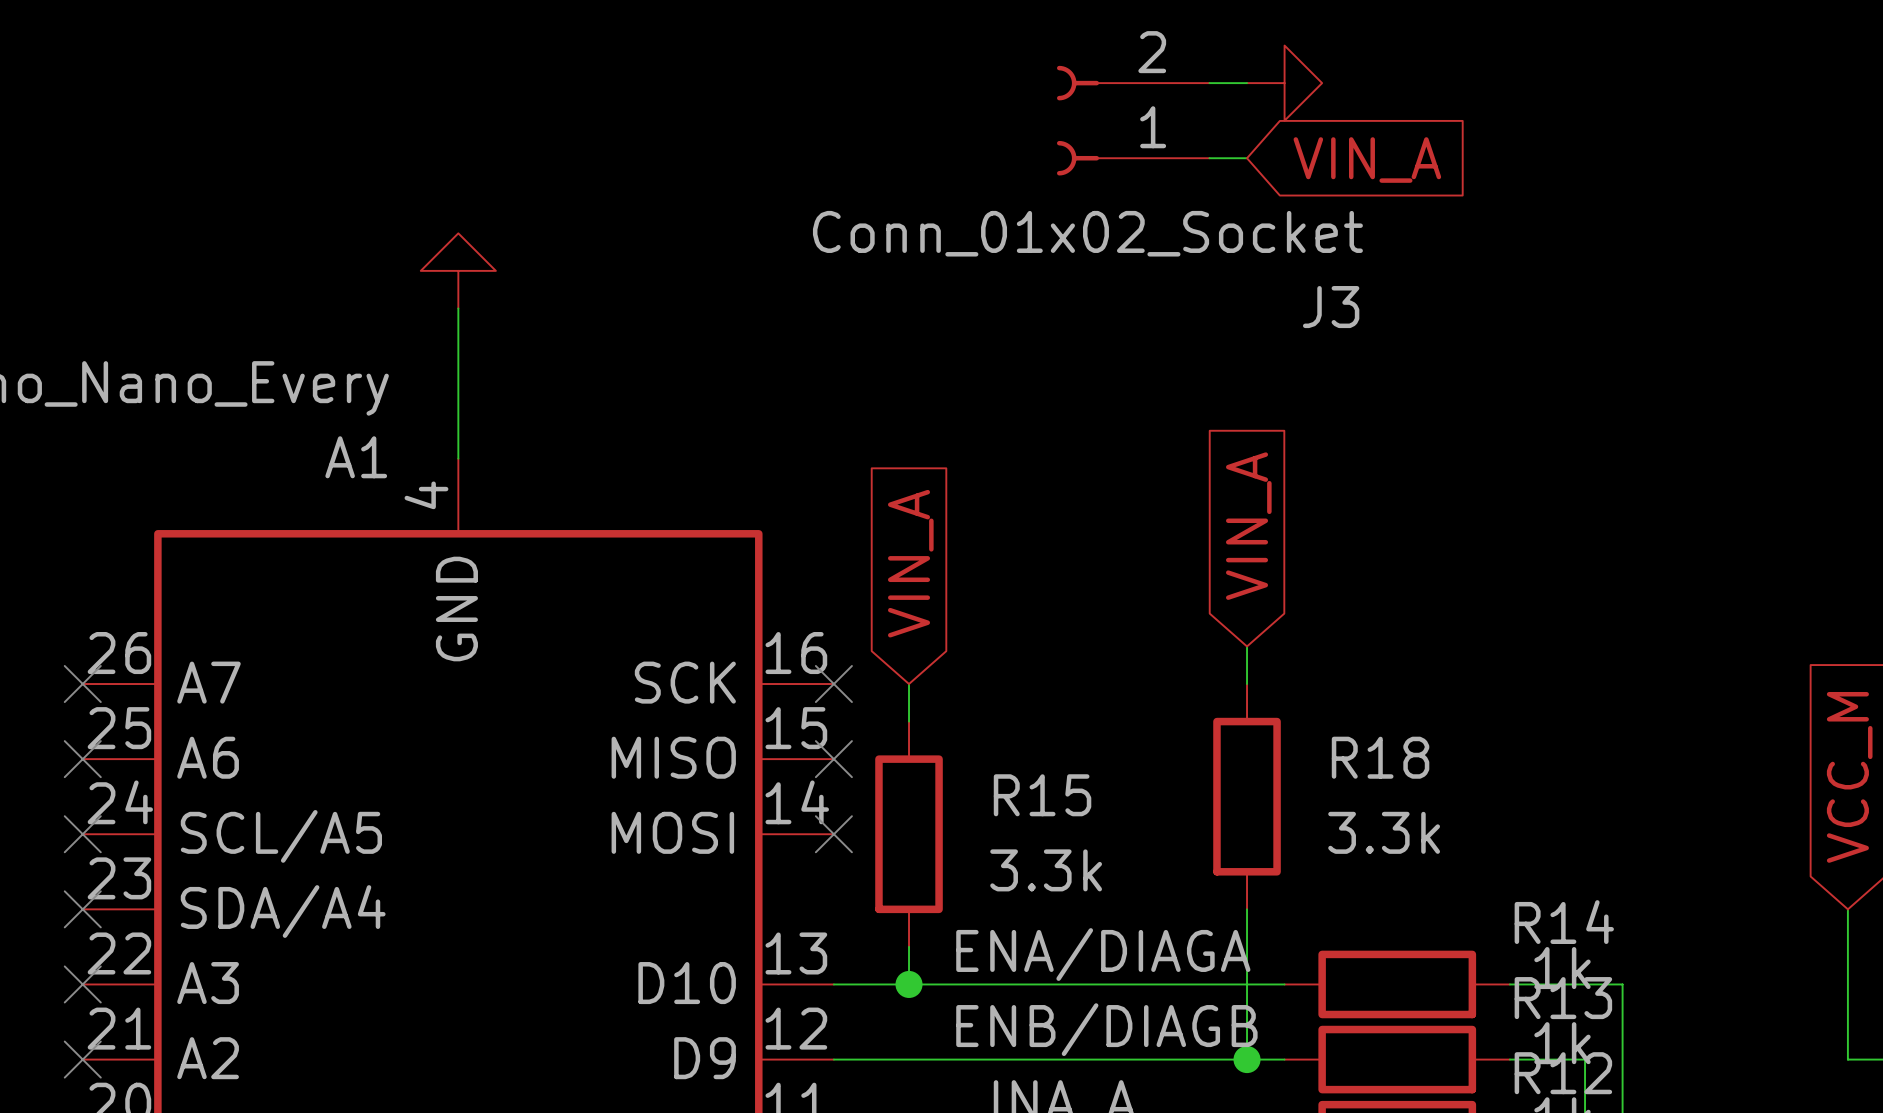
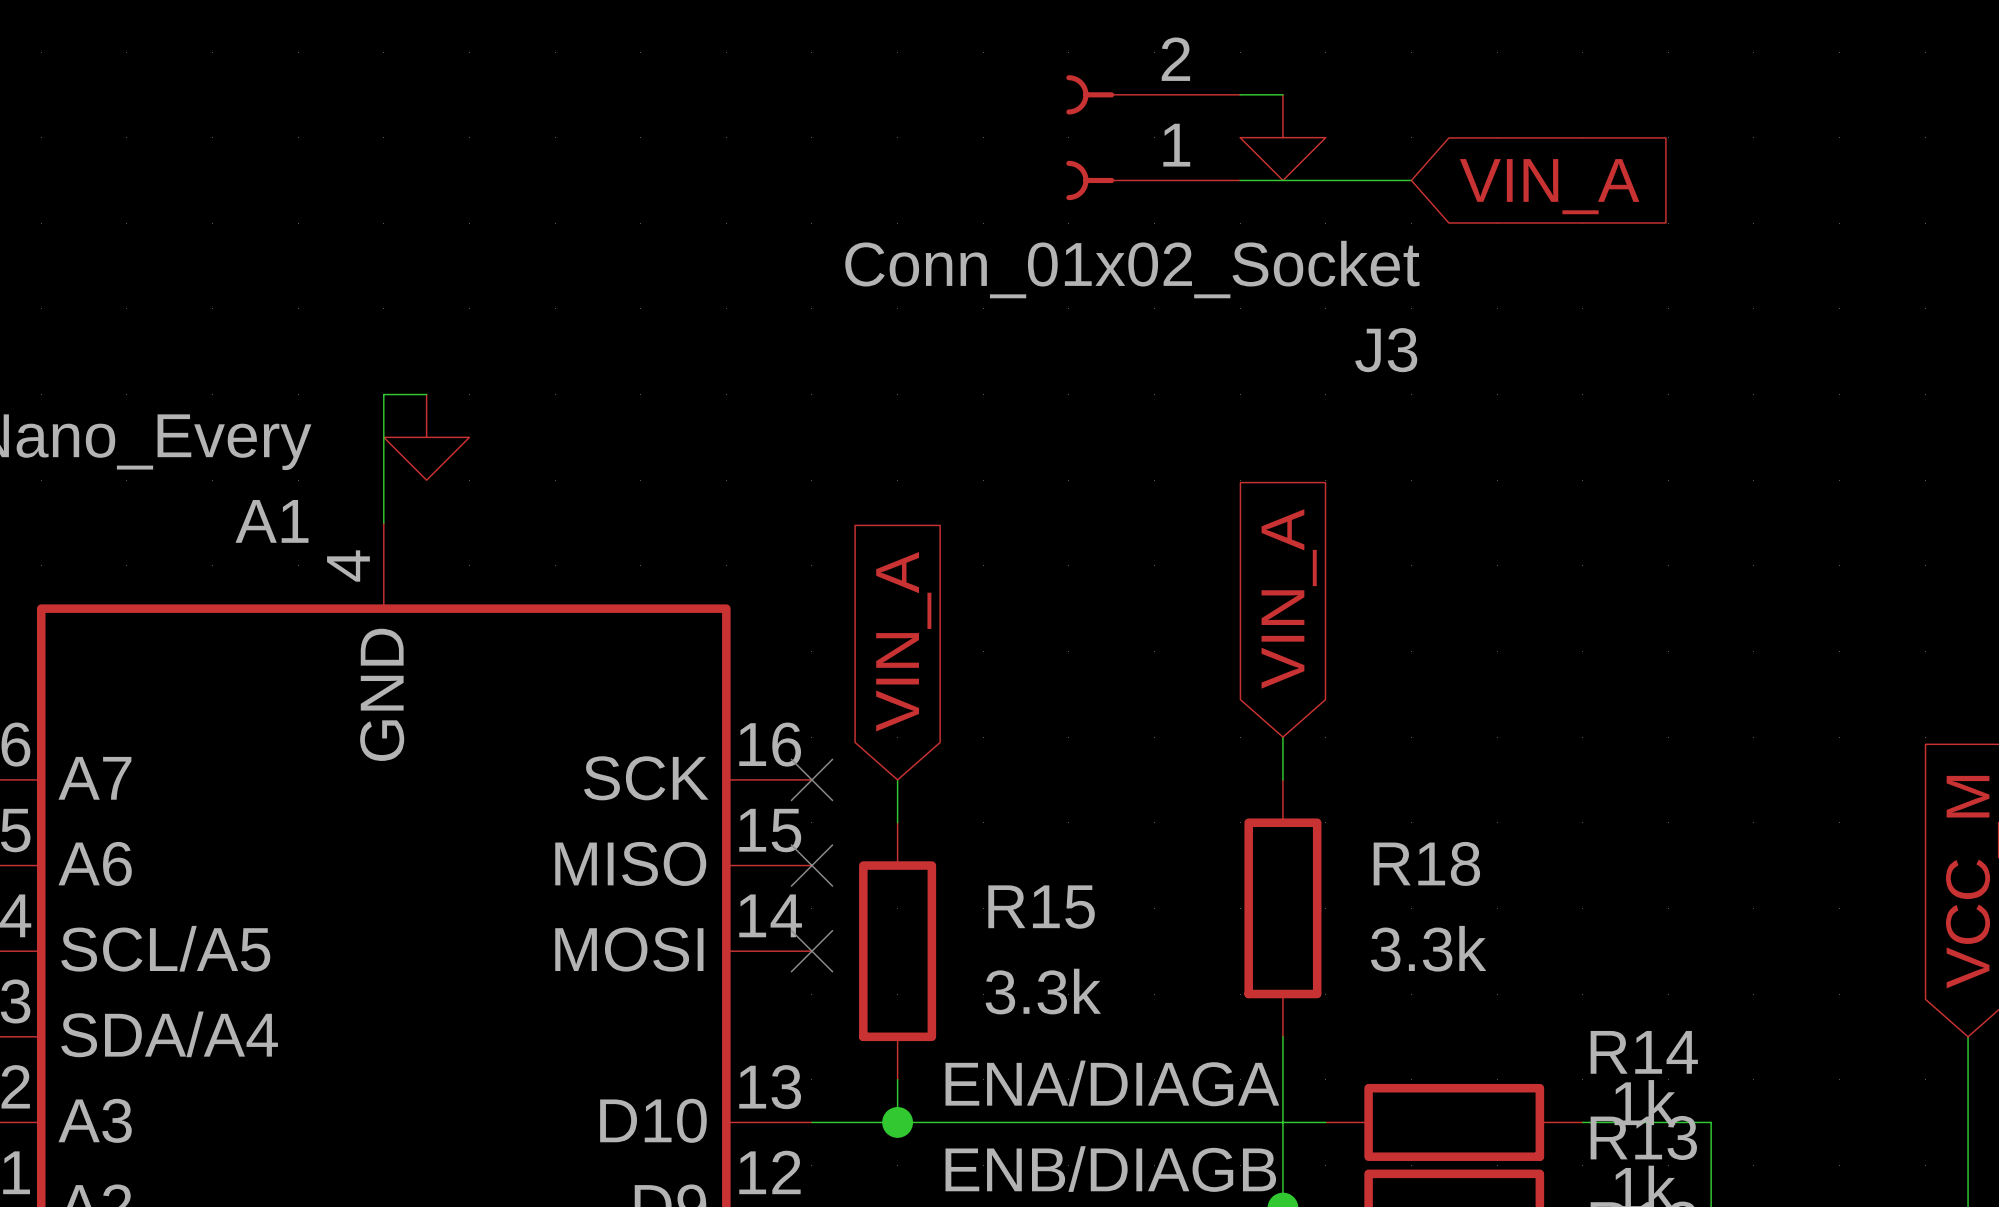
power symbol rotation: 0° (1284, 83) -> 90° clockwise (1282, 137)
power symbol position: (1284, 83) -> (1282, 137)
wire: none -> (1282, 180) (1411, 180)
global label position: VIN_A (1367, 160) -> VIN_A (1549, 186)
power symbol rotation: 0° (458, 270) -> 180° (426, 437)
power symbol position: (458, 270) -> (426, 437)
wire: (458, 308) (458, 346) -> (426, 394) (383, 394)

